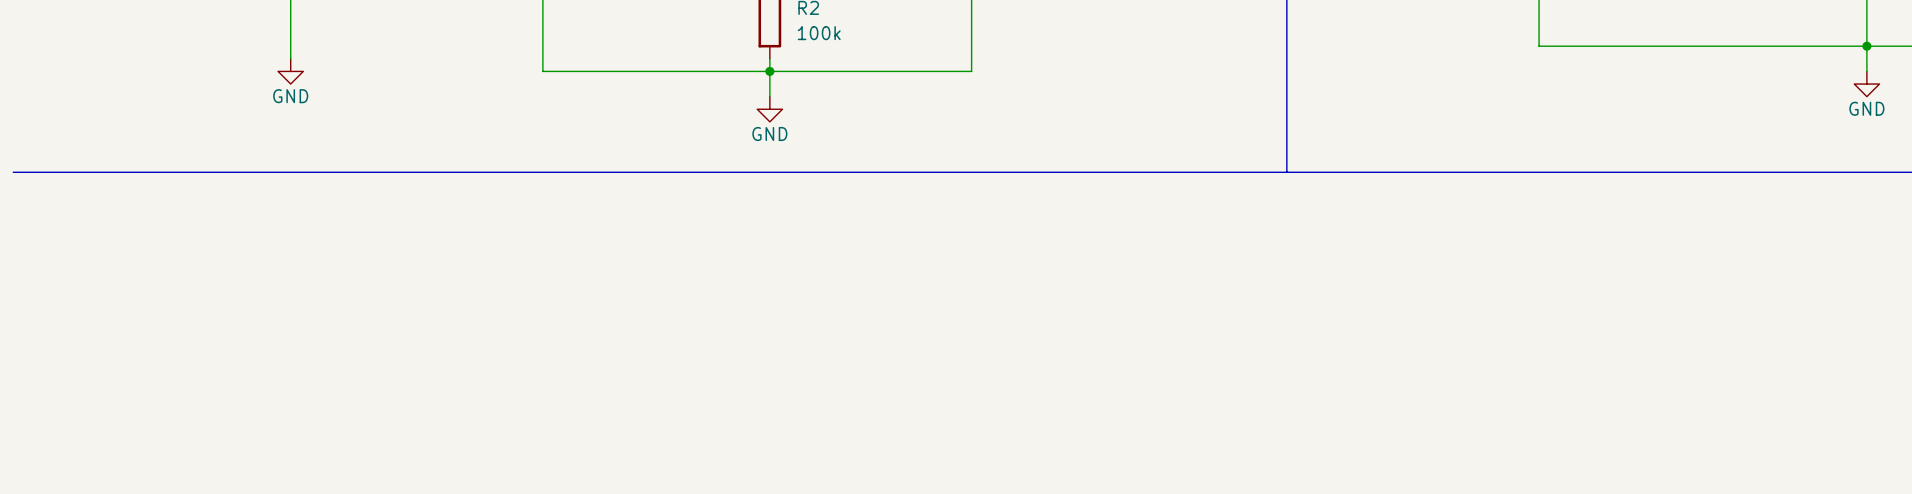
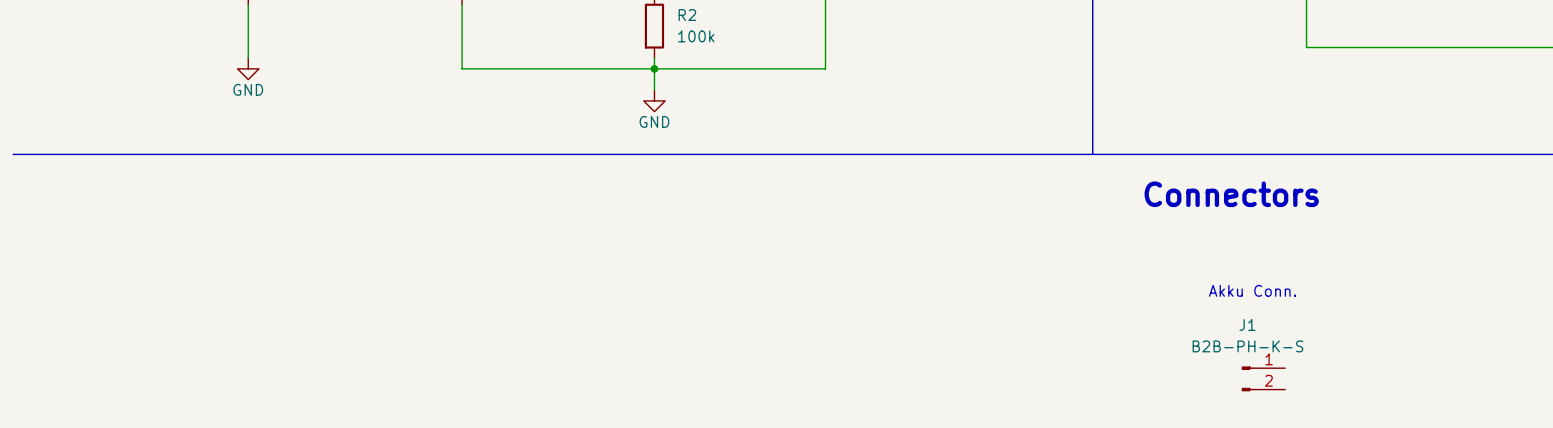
text: none -> Connectors (1231, 194)
text: none -> Akku Conn. (1252, 290)
J1: none -> B2B-PH-K-S (1263, 378)

